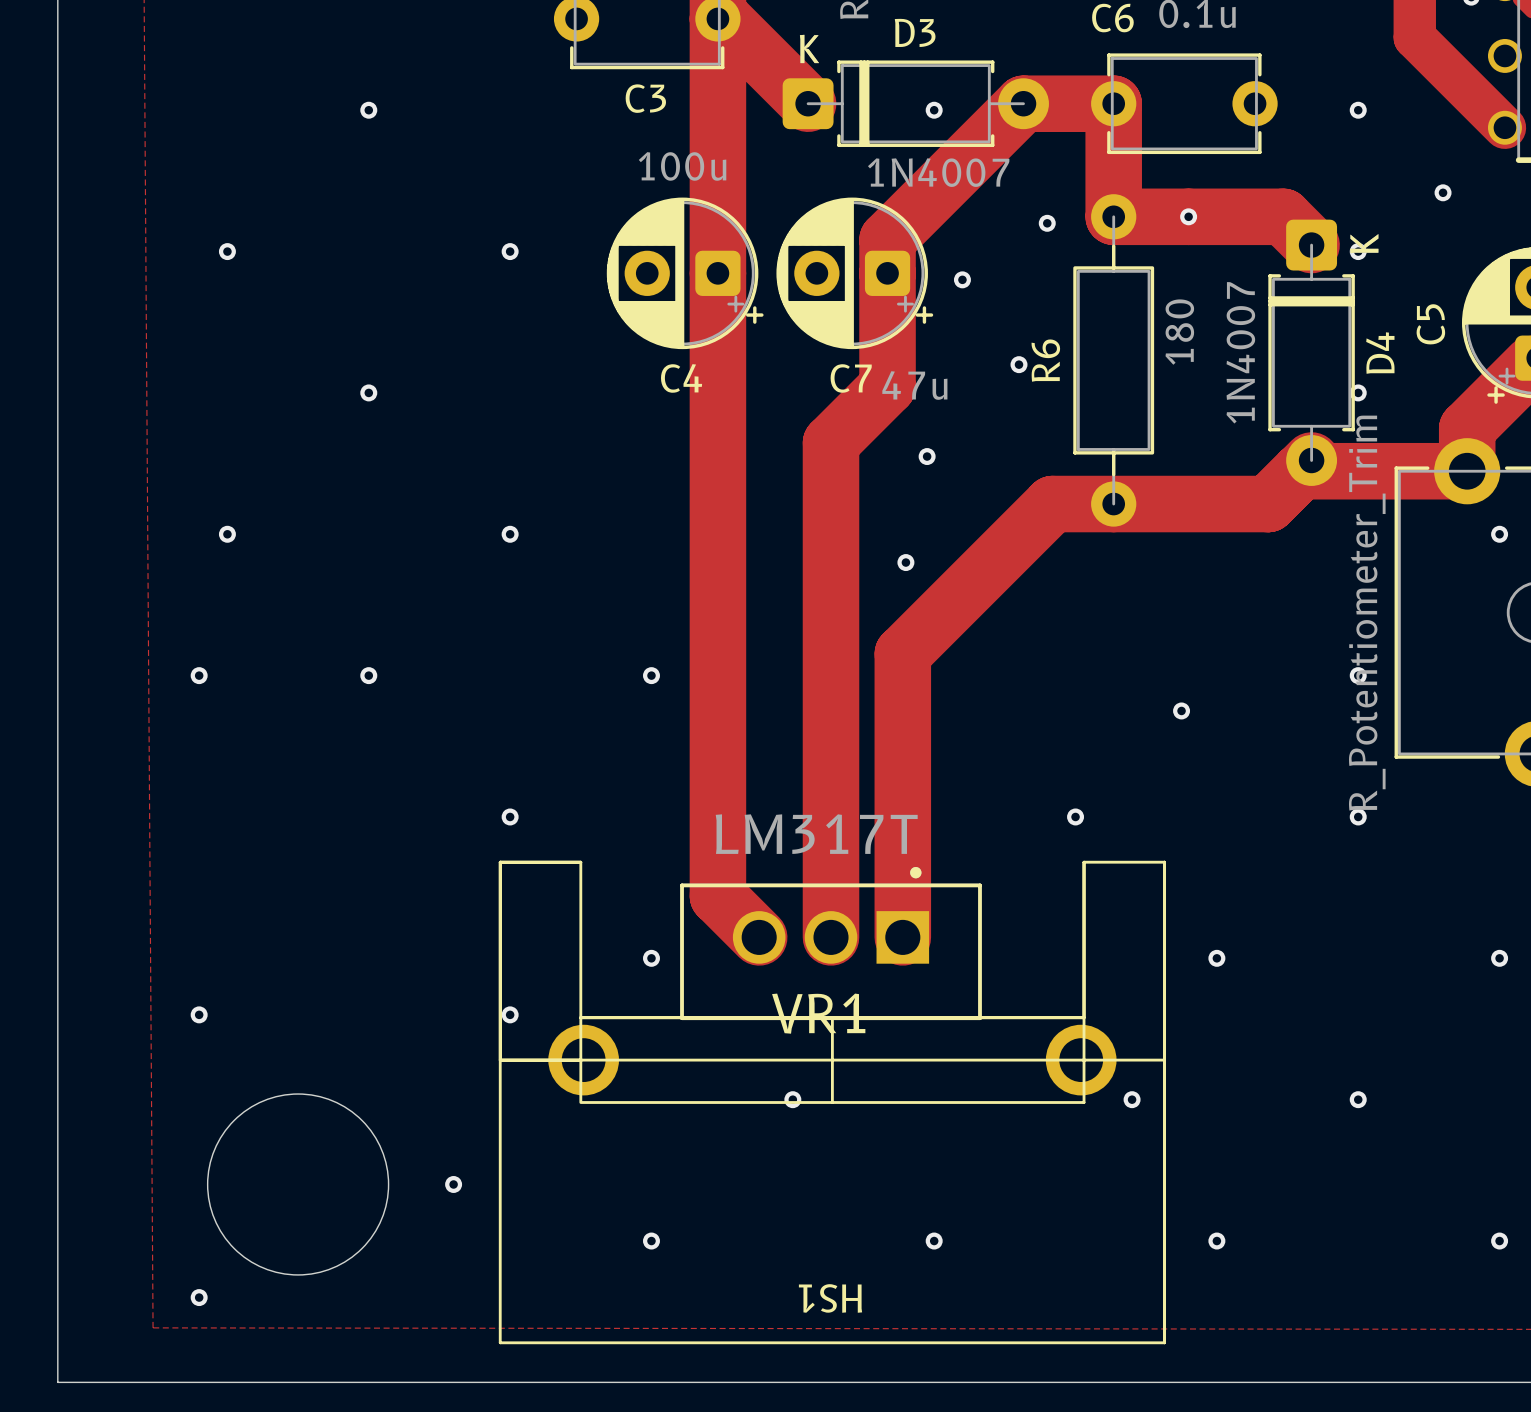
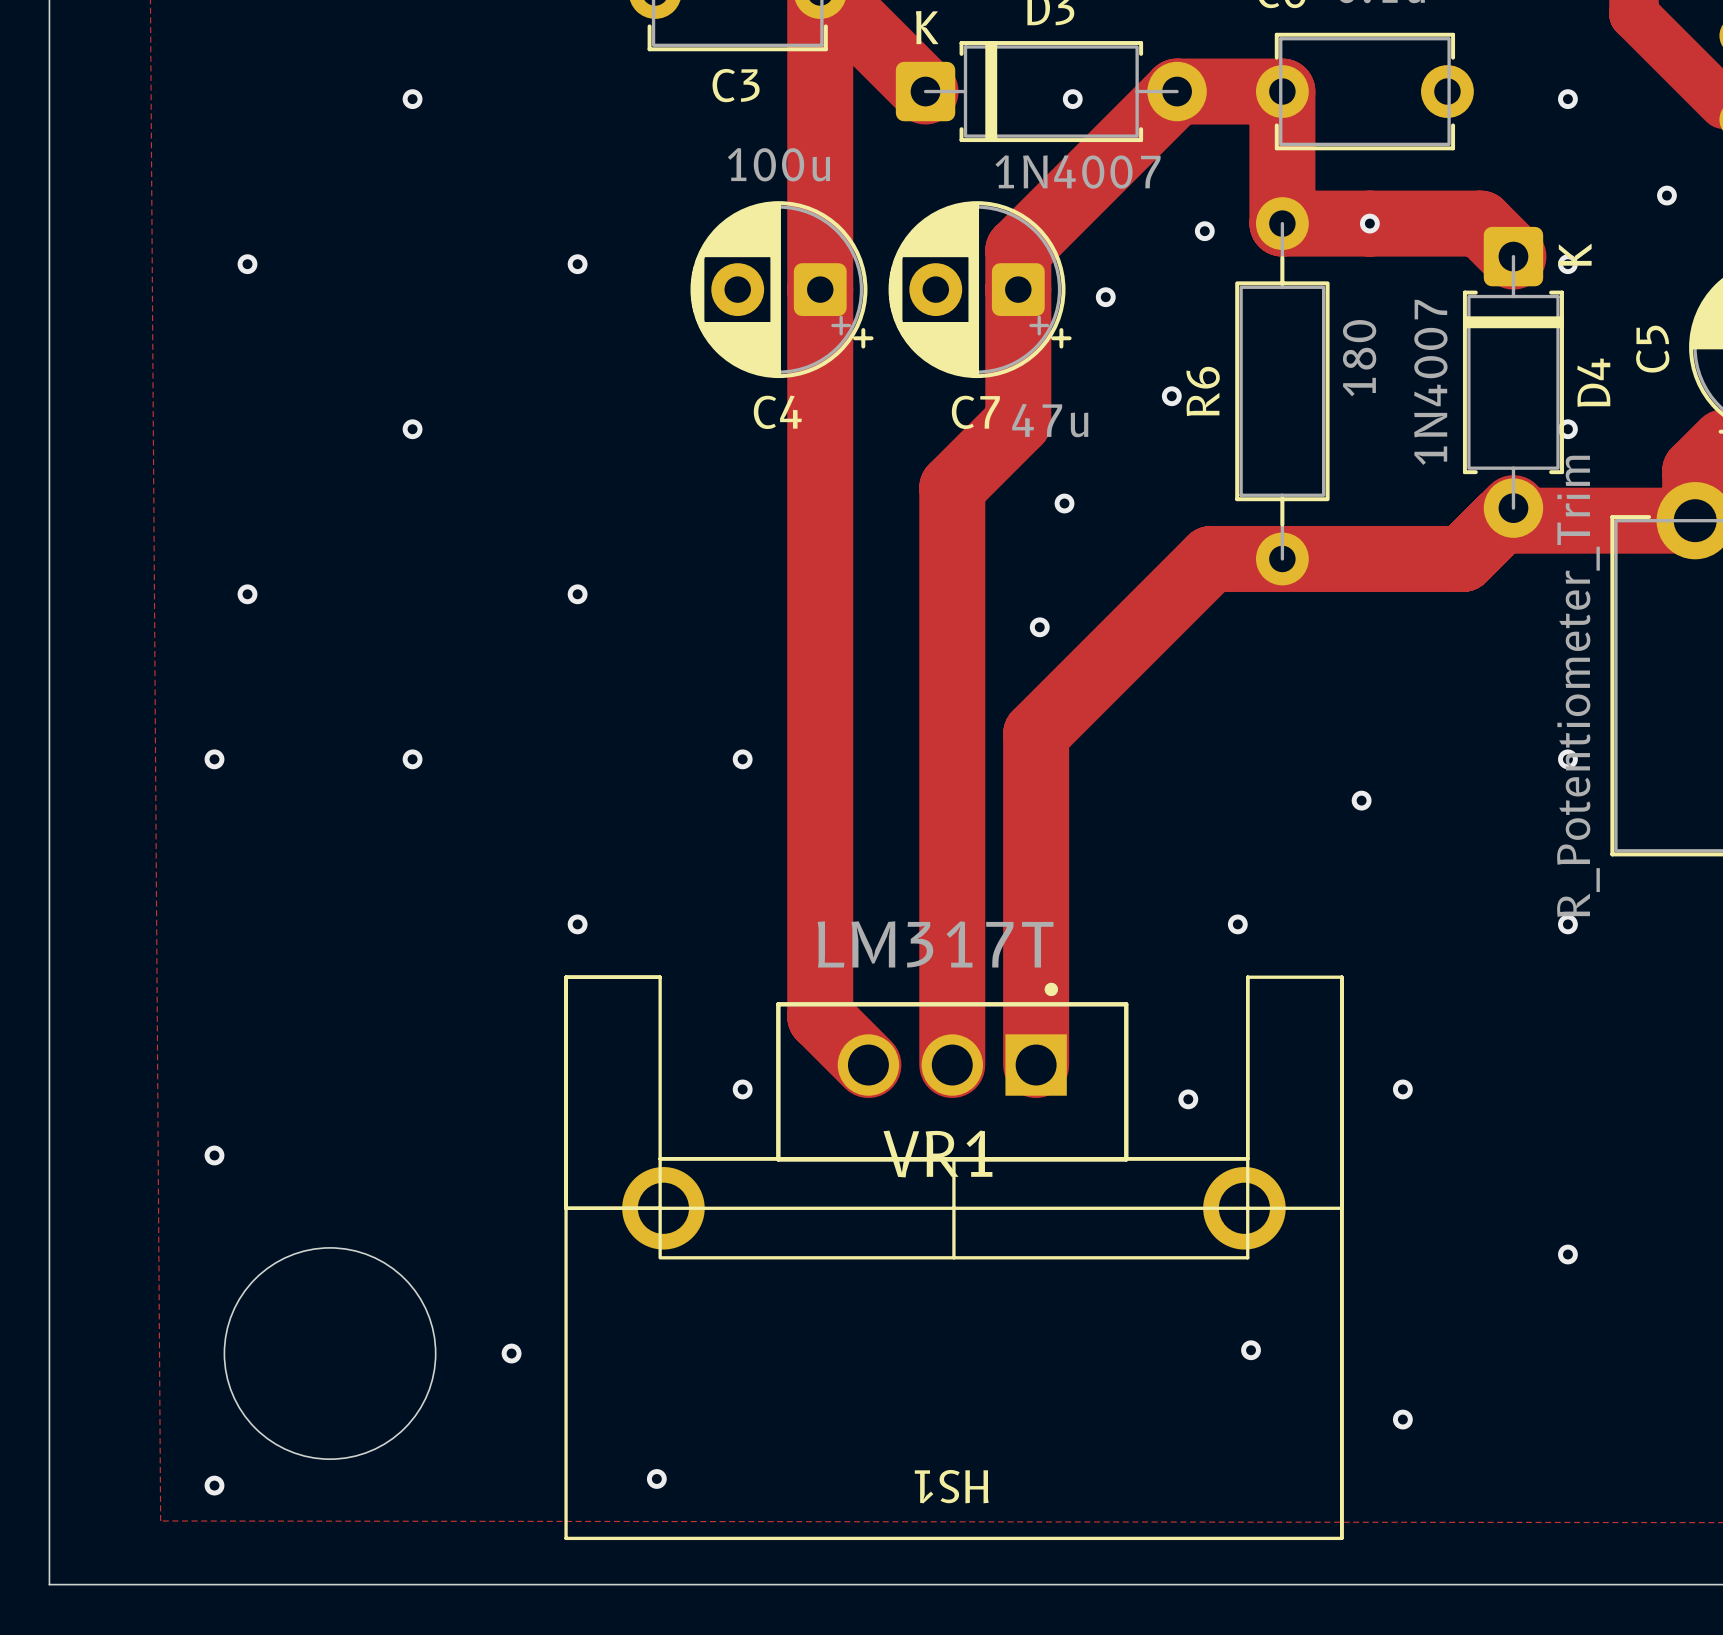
via: none -> (1188, 1099)
via: (510, 1014) -> none
via: (792, 1099) -> none
via: (1132, 1099) -> none
via: none -> (1251, 1350)
via position: (651, 1241) -> (656, 1478)
via: (934, 1241) -> none

